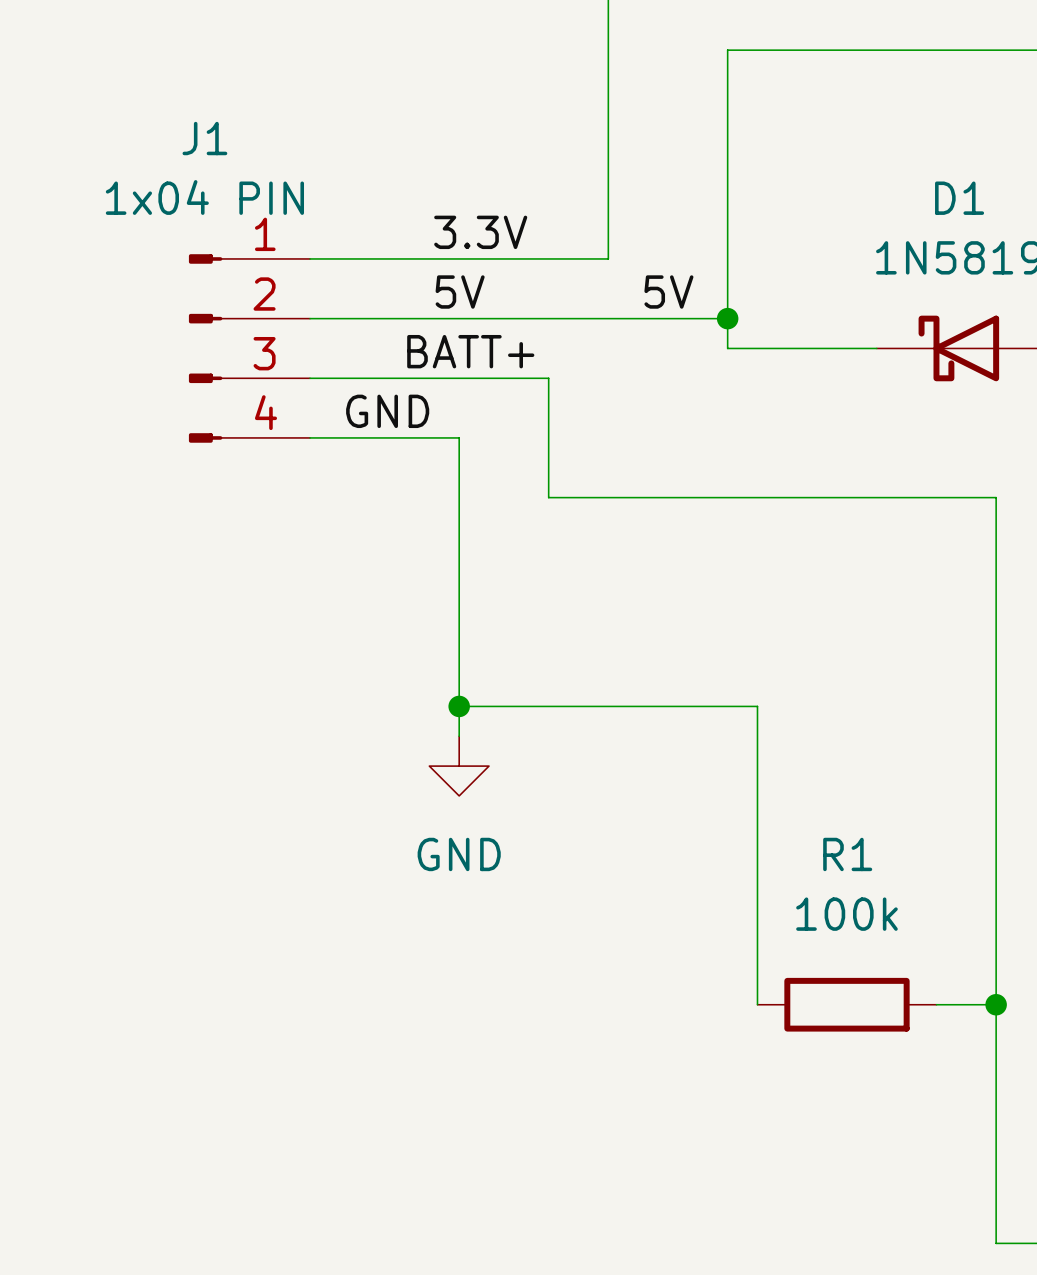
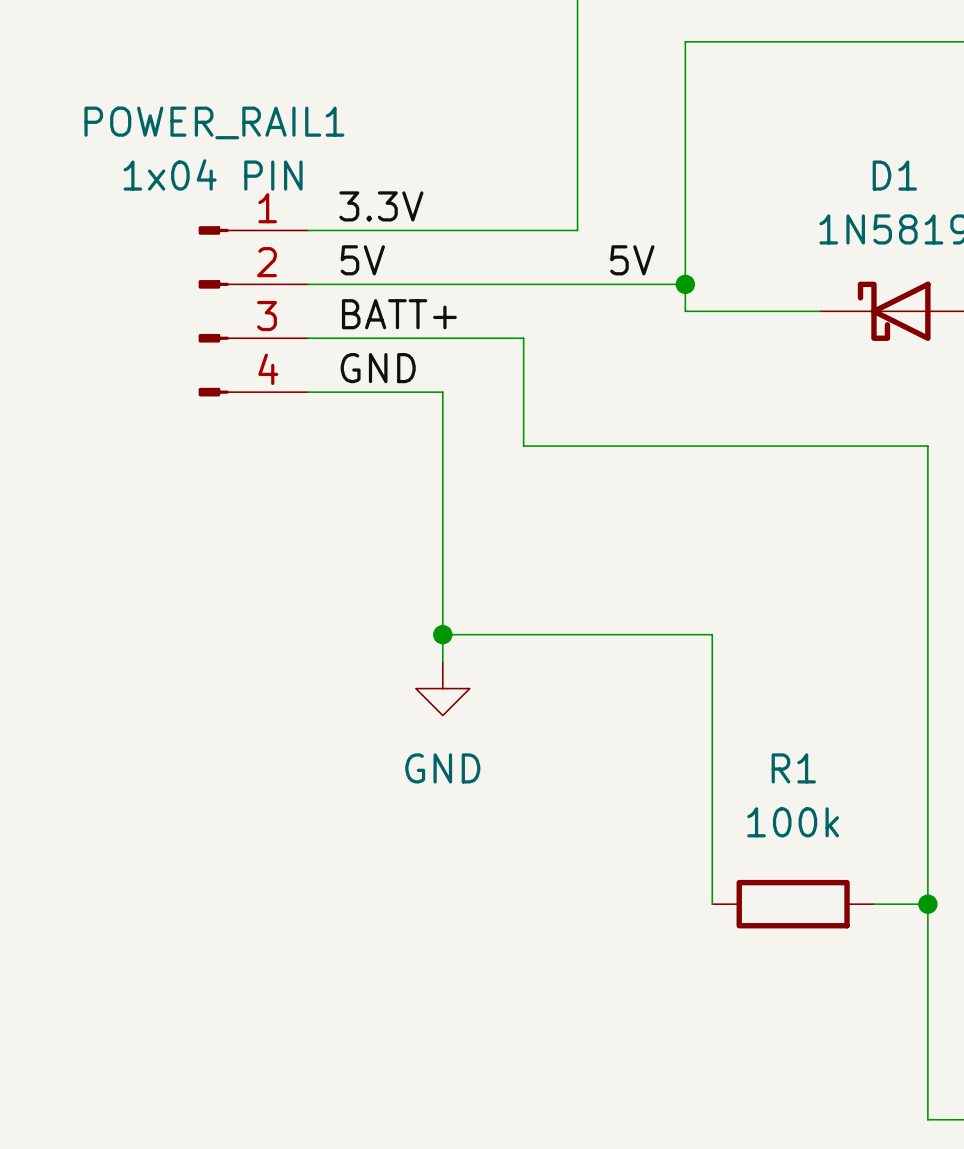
J1 name: J1 (204, 138) -> POWER_RAIL1 (214, 122)
label position: 3.3V (480, 232) -> 3.3V (381, 206)
label position: 5V (460, 292) -> 5V (362, 260)
label position: BATT+ (470, 351) -> BATT+ (399, 314)

